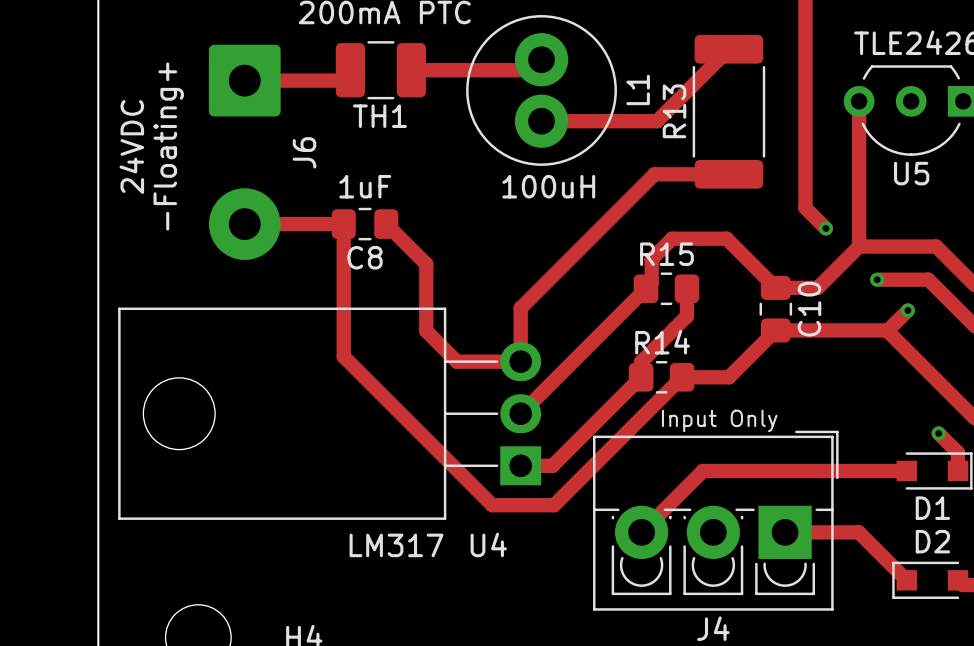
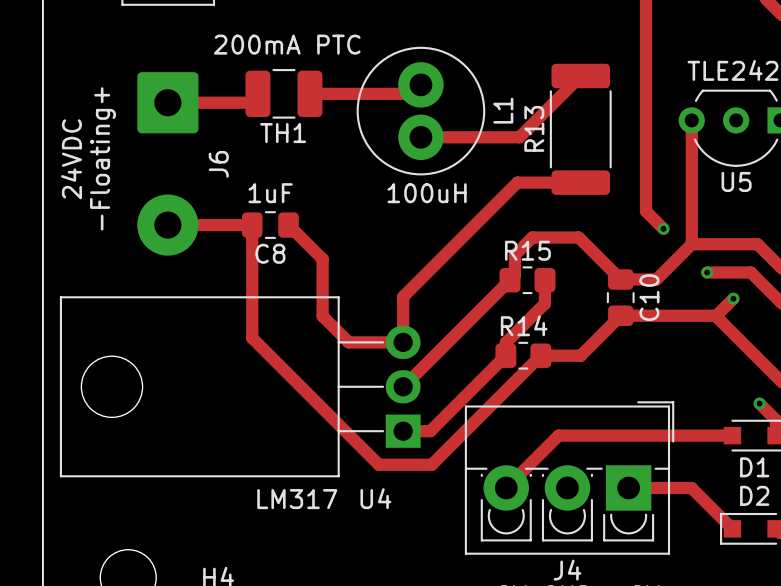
text: Input Only (719, 420) -> none

